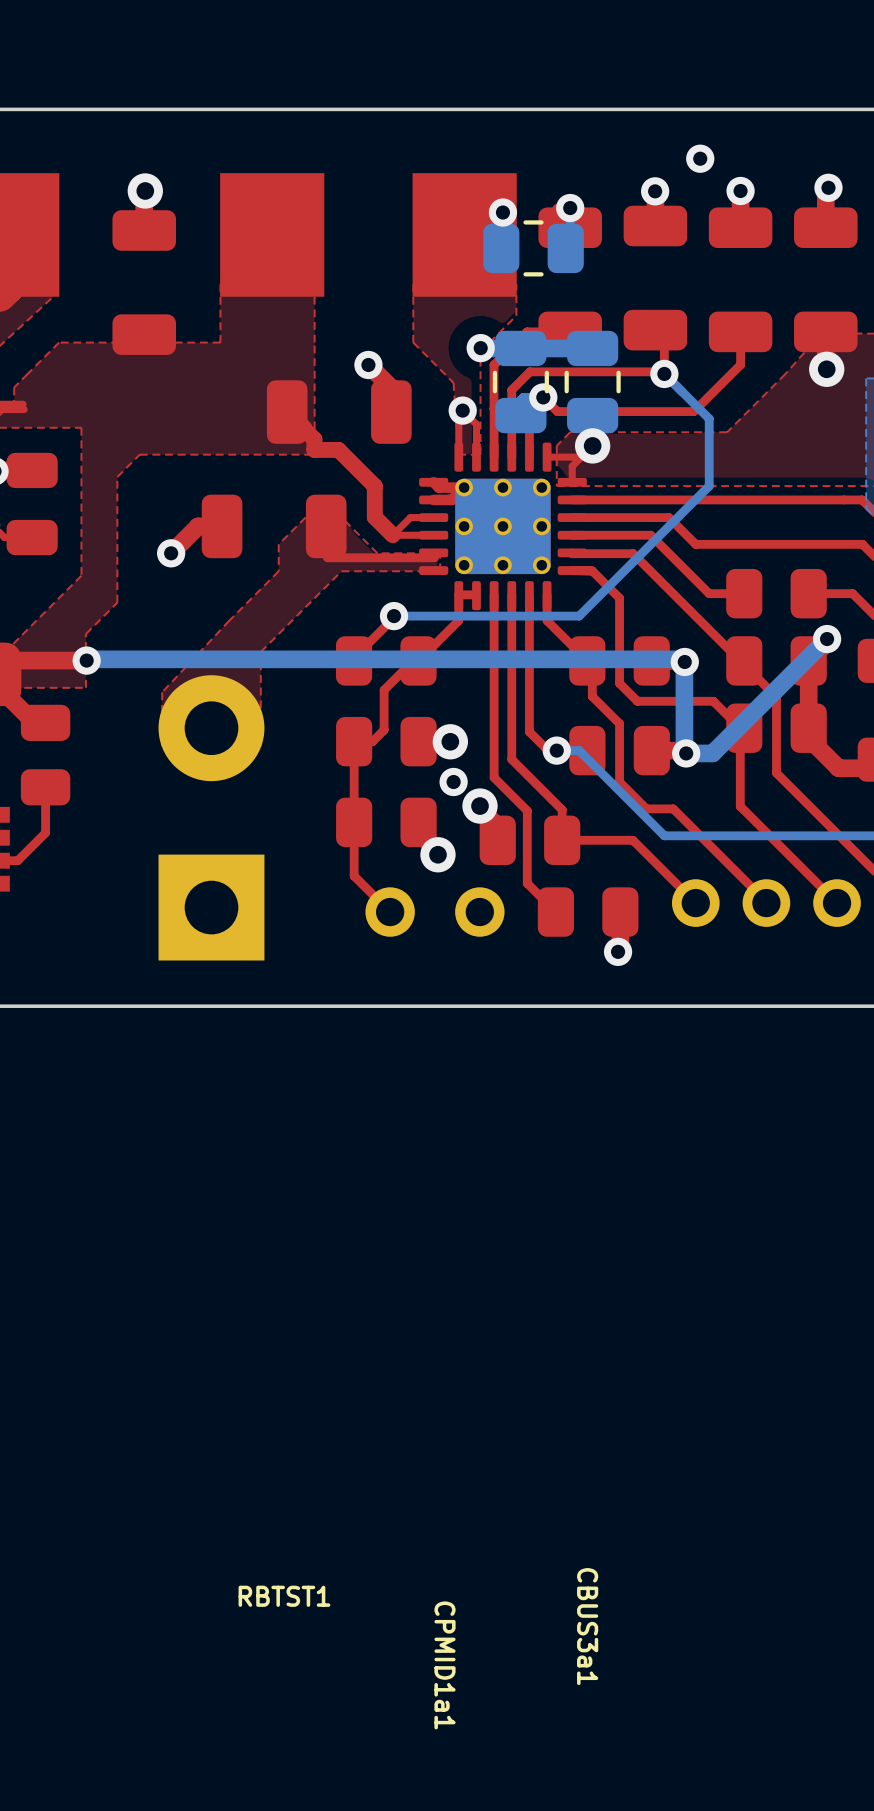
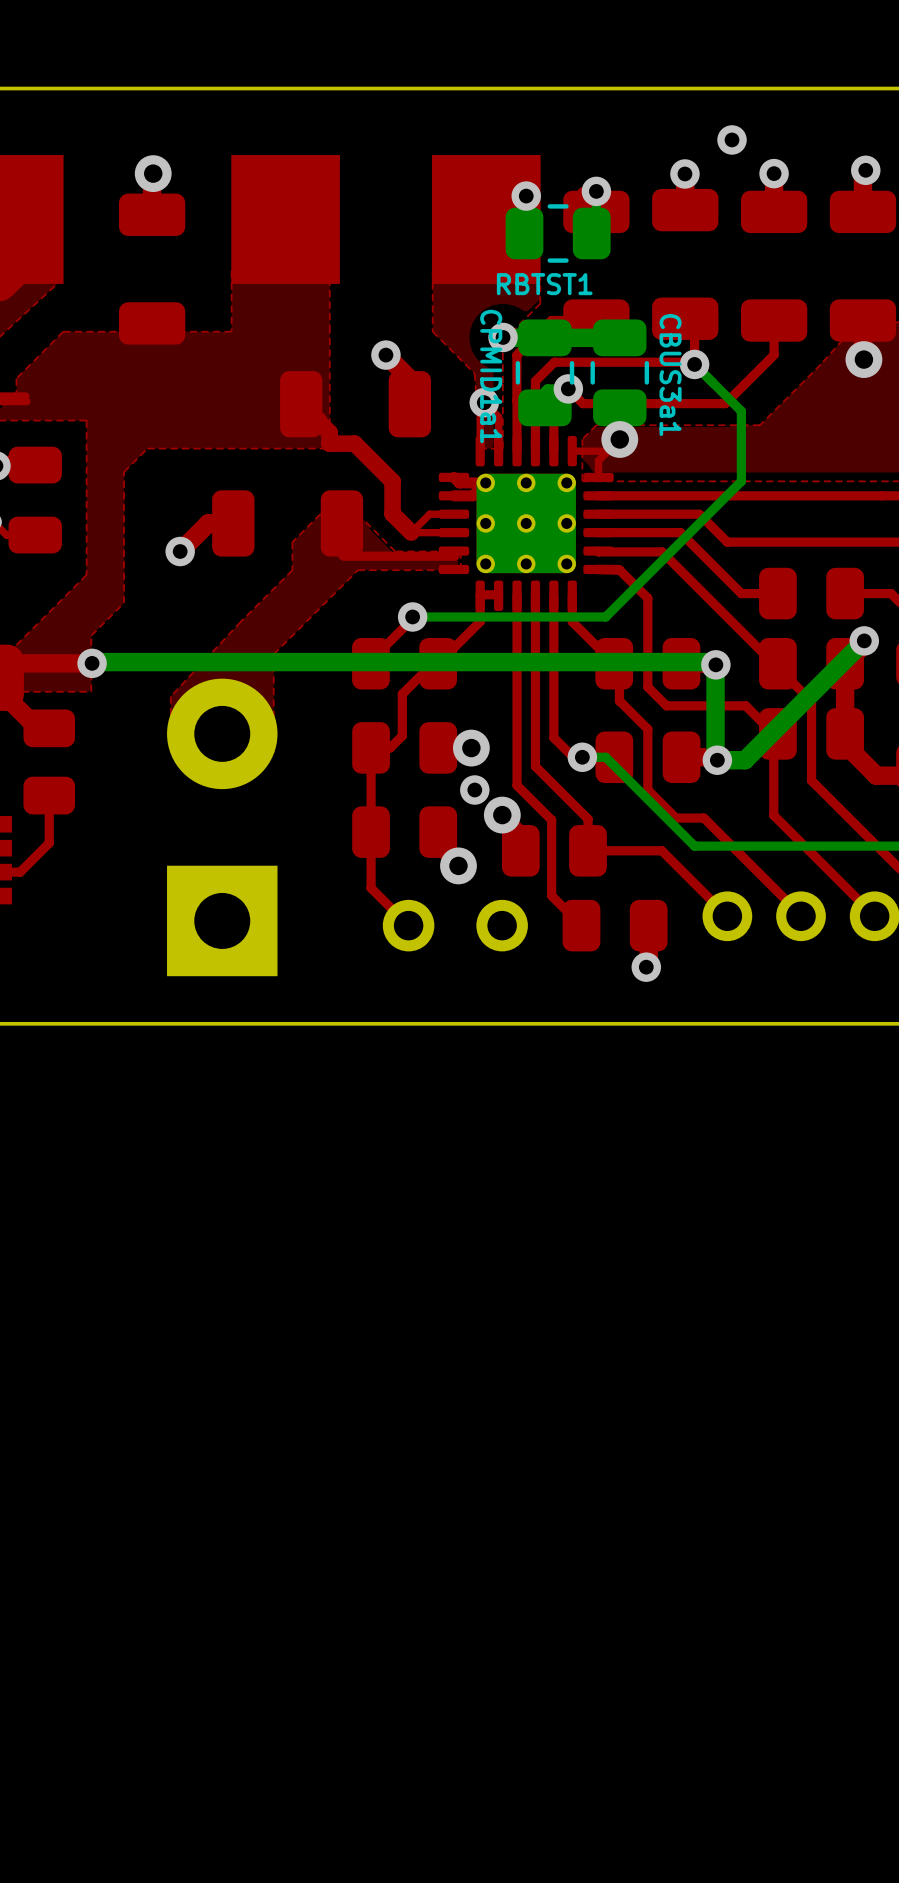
RBTST1 name position: RBTST1 (284, 1596) -> RBTST1 (544, 284)
CBUS3a1 name position: CBUS3a1 (587, 1626) -> CBUS3a1 (670, 375)
CPMID1a1 name position: CPMID1a1 (445, 1665) -> CPMID1a1 (491, 376)

